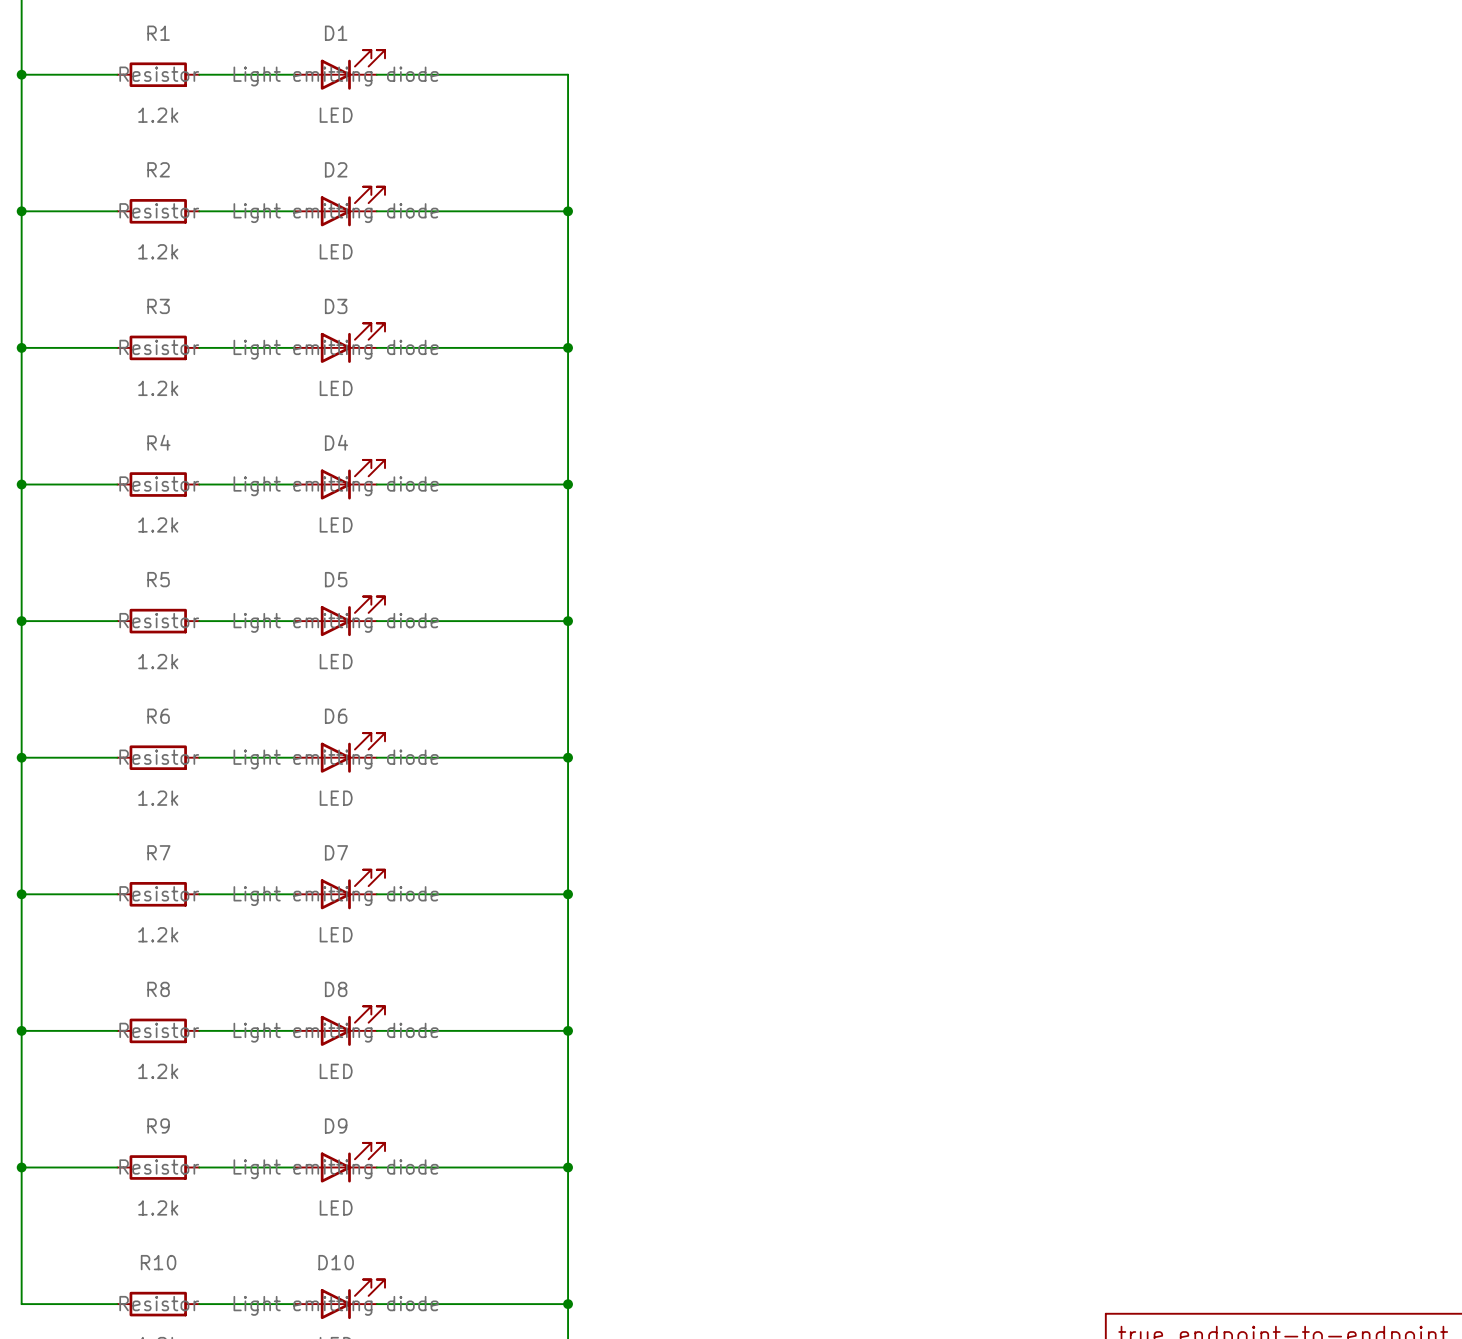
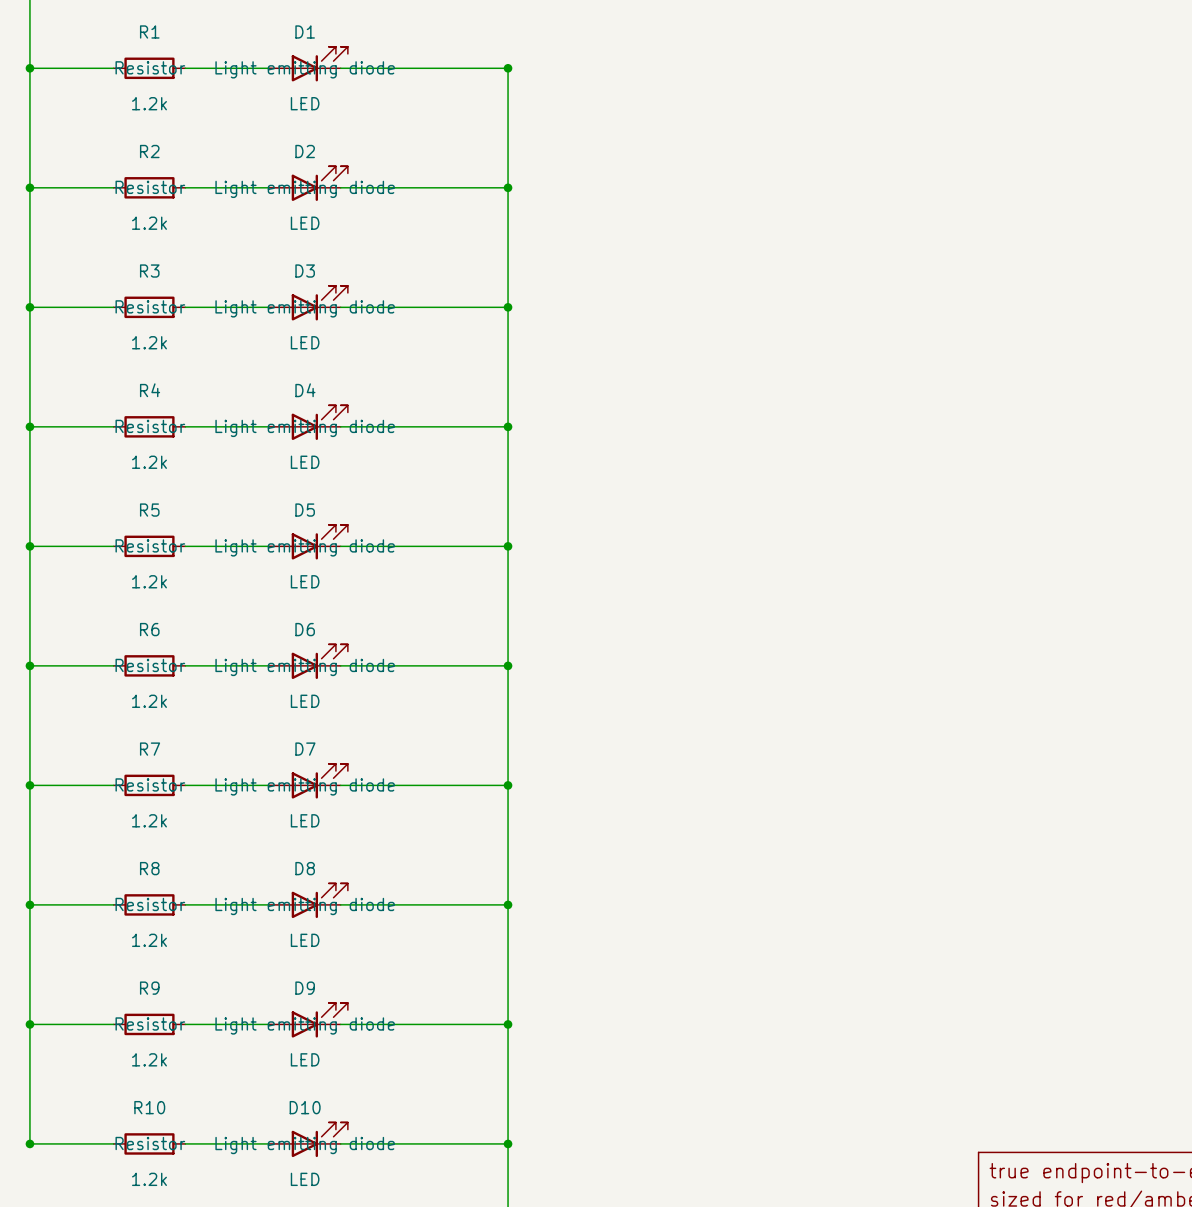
junction: none -> (508, 68)
junction: none -> (29, 1143)

